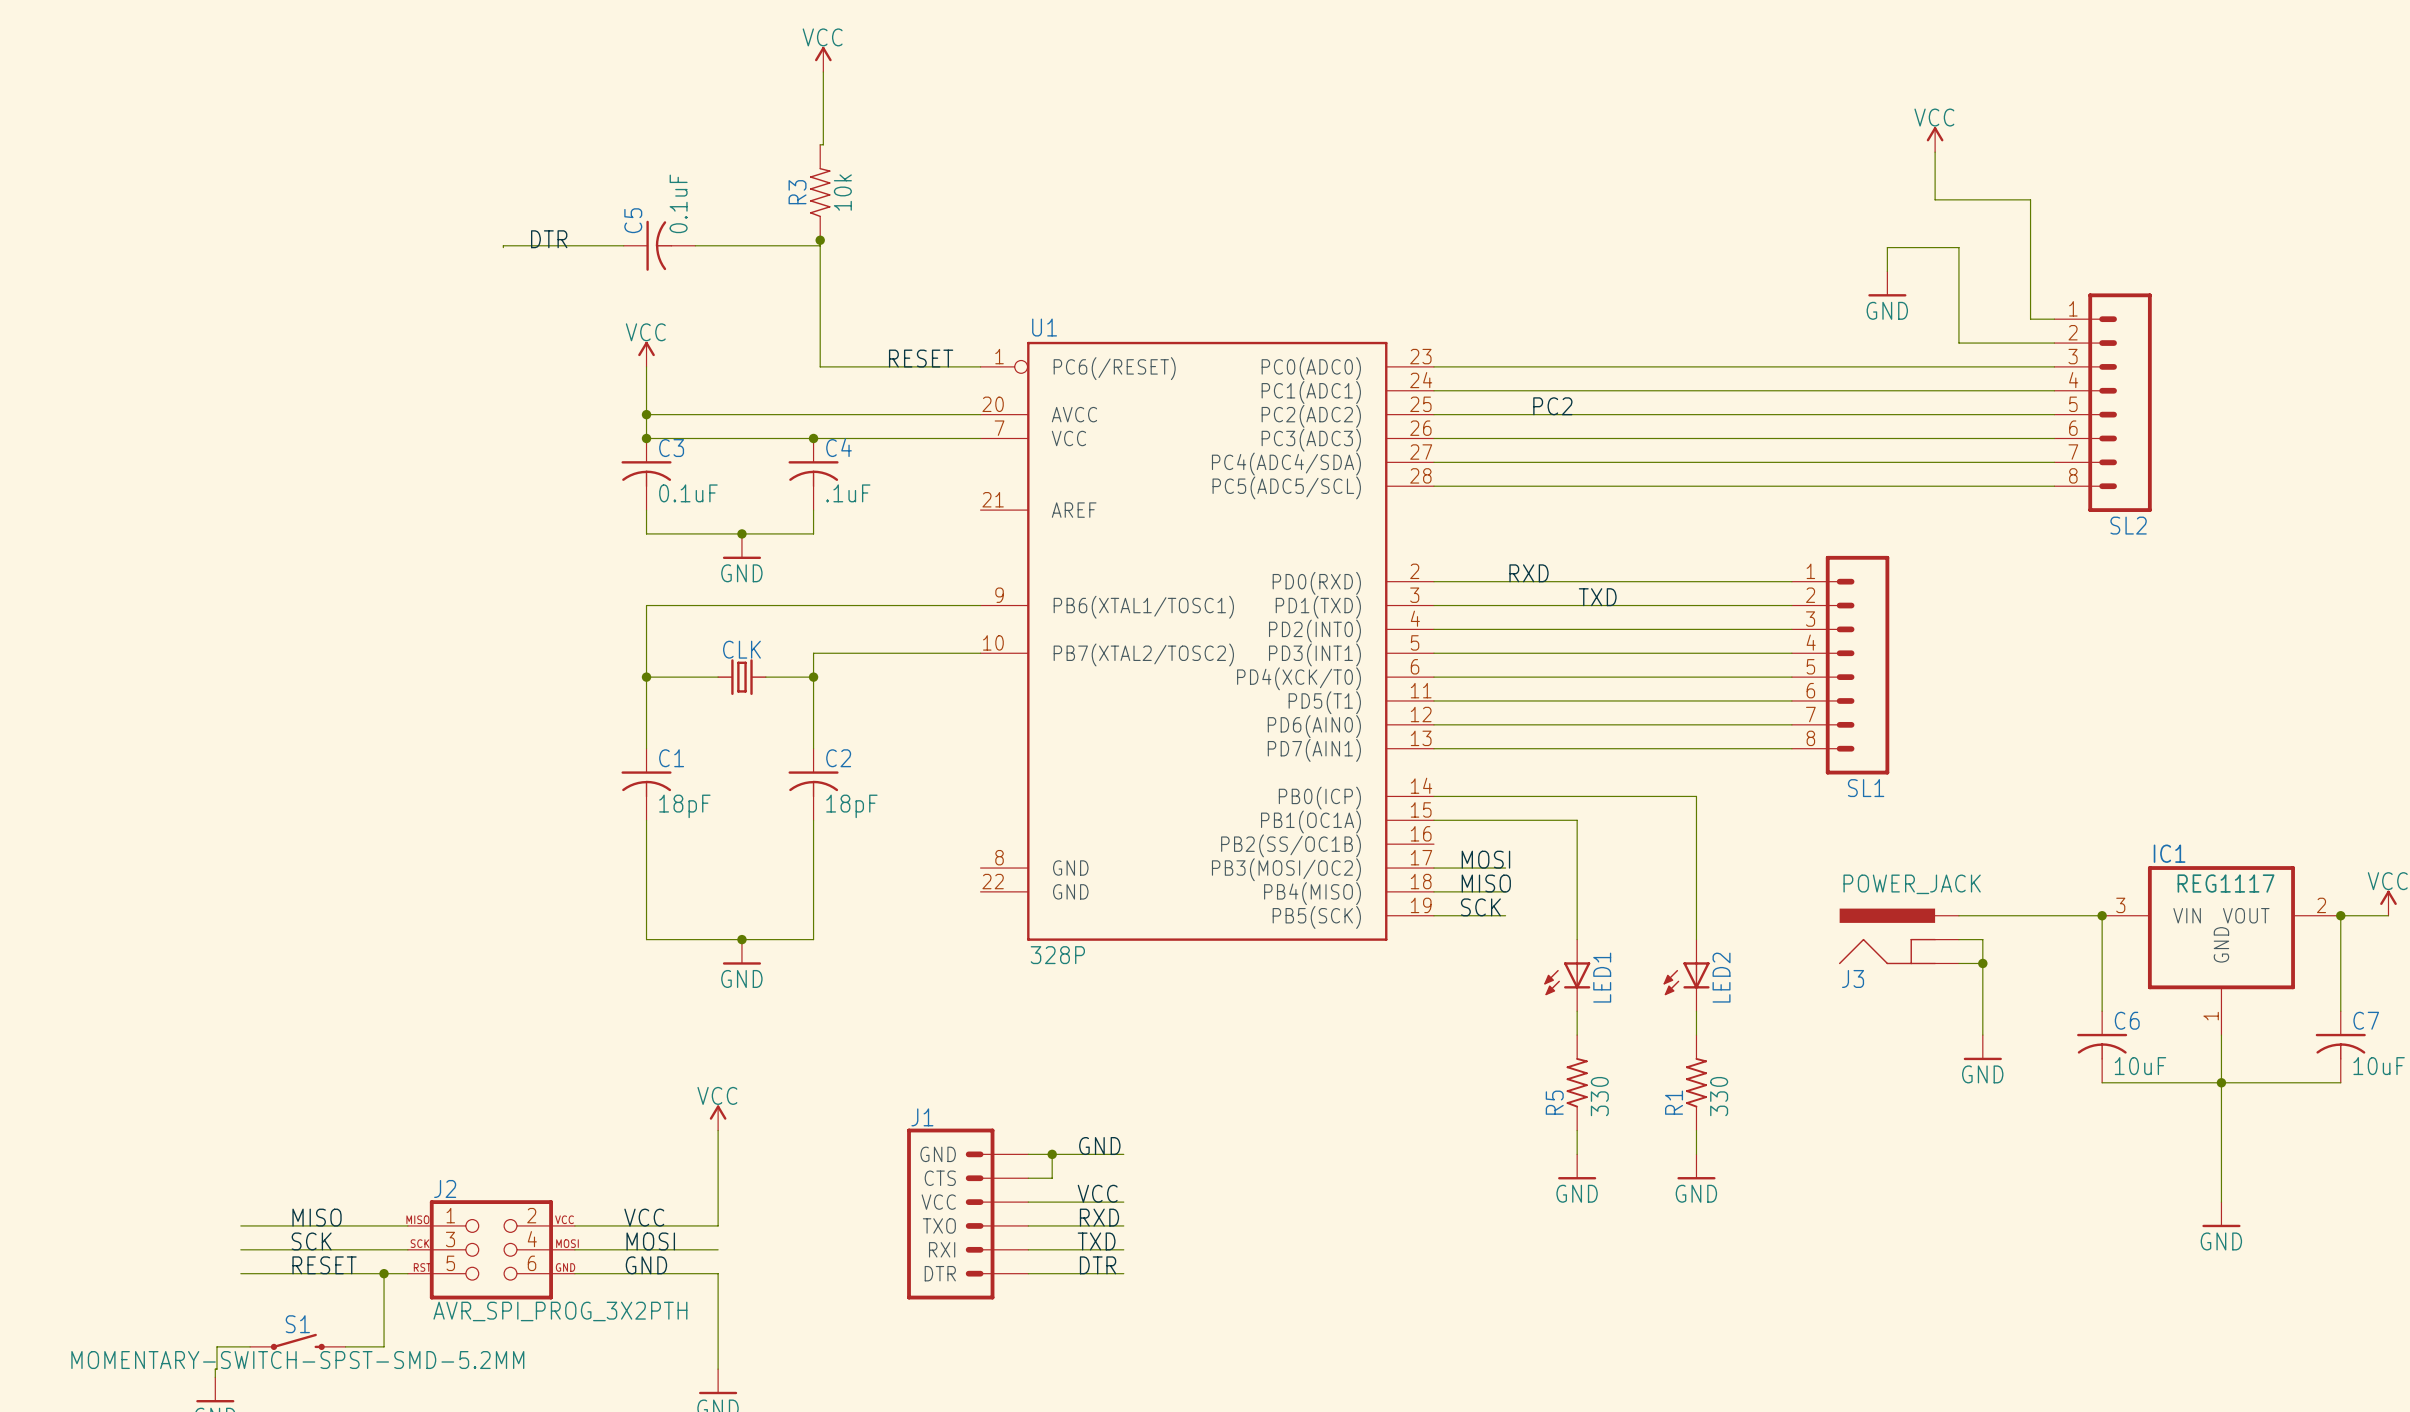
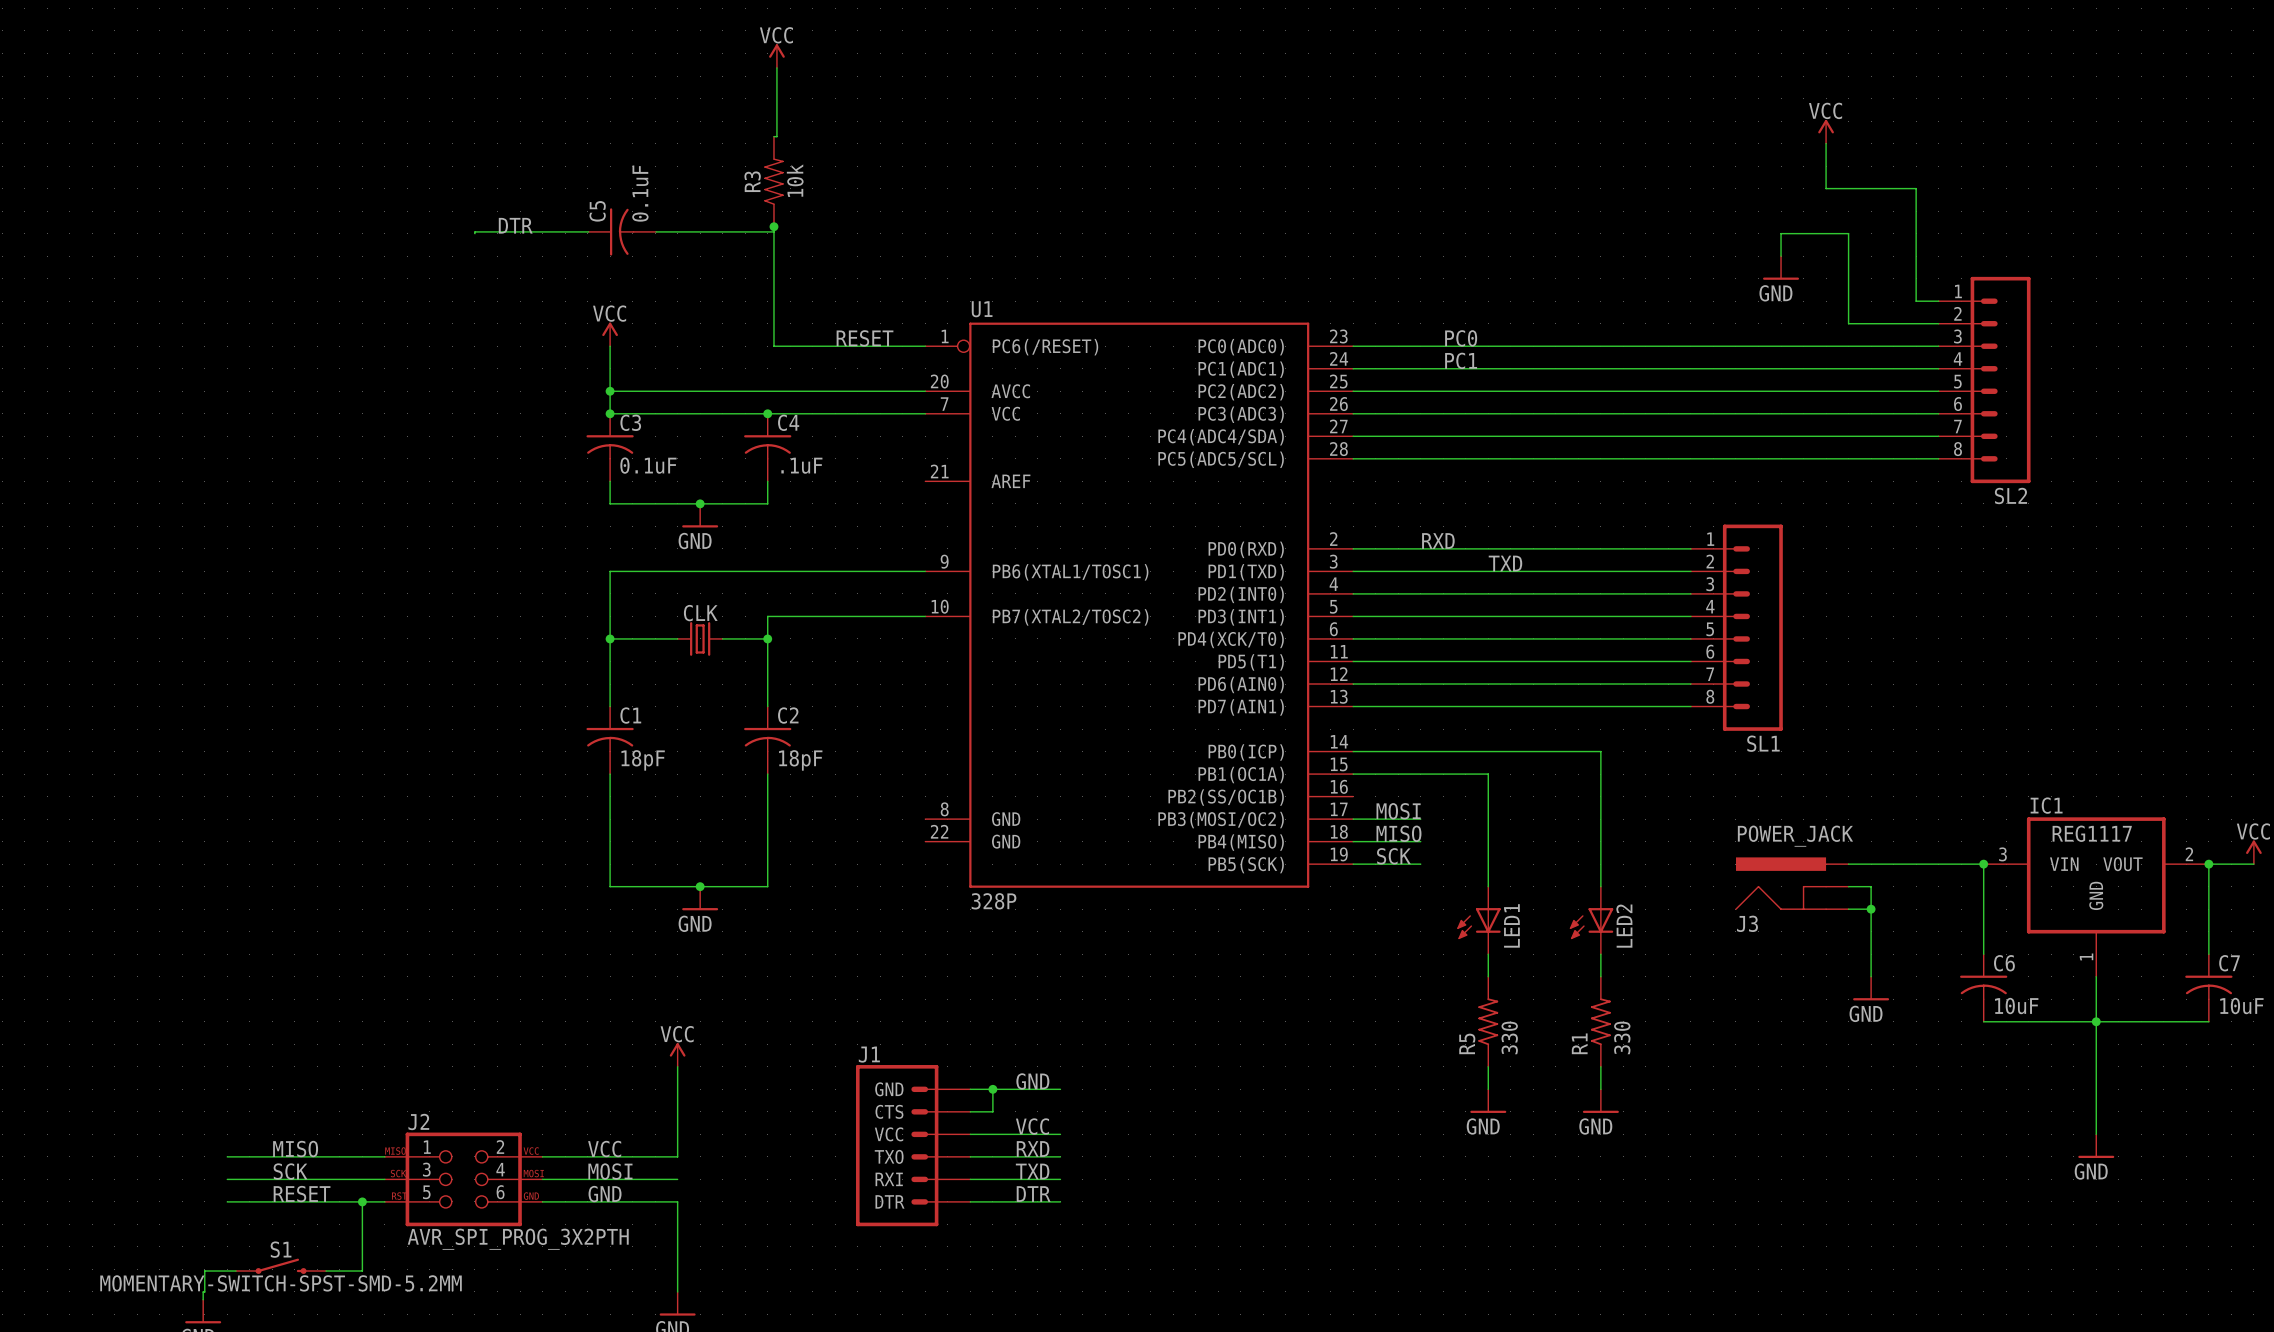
label: none -> PC0 (1461, 338)
label: PC2 (1552, 406) -> PC1 (1461, 360)

